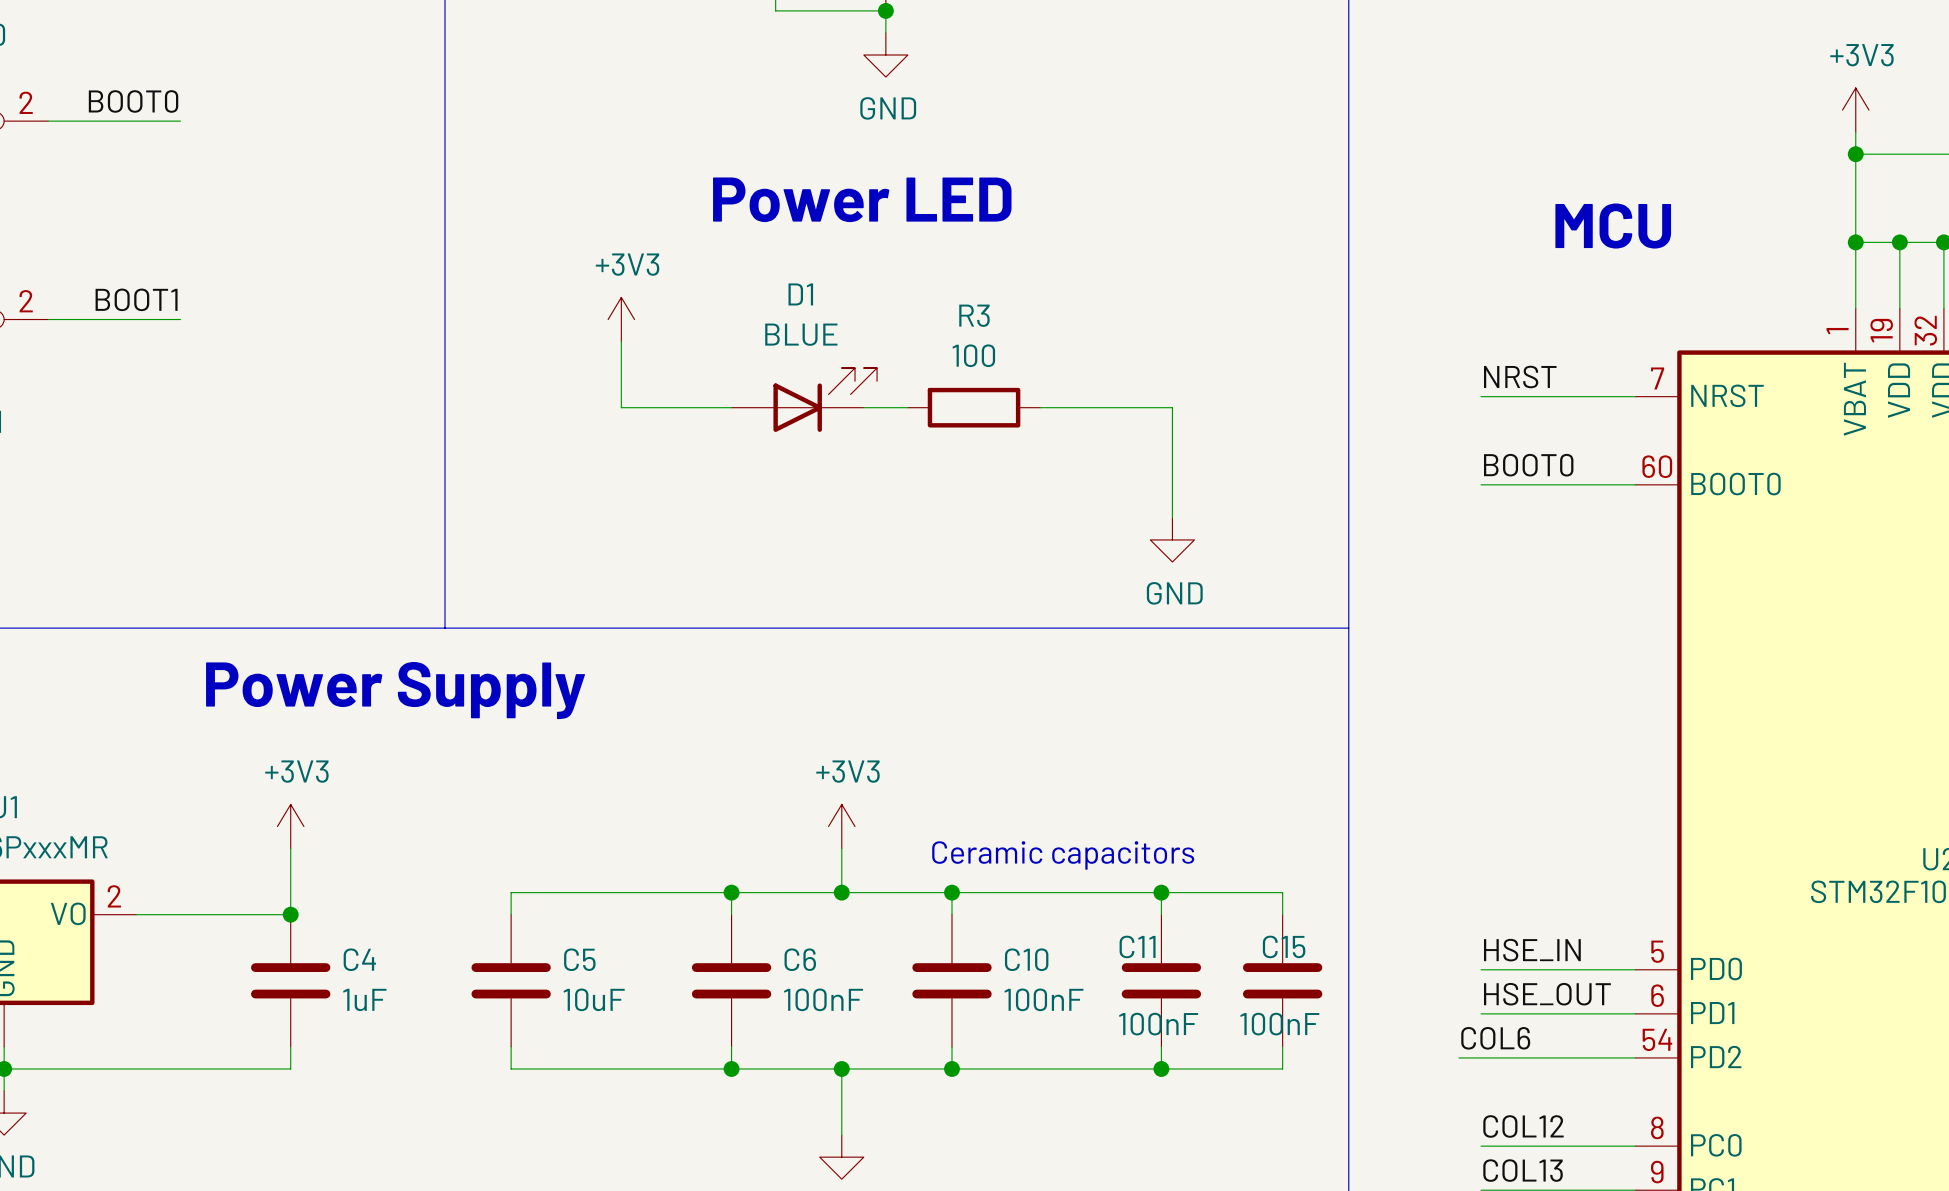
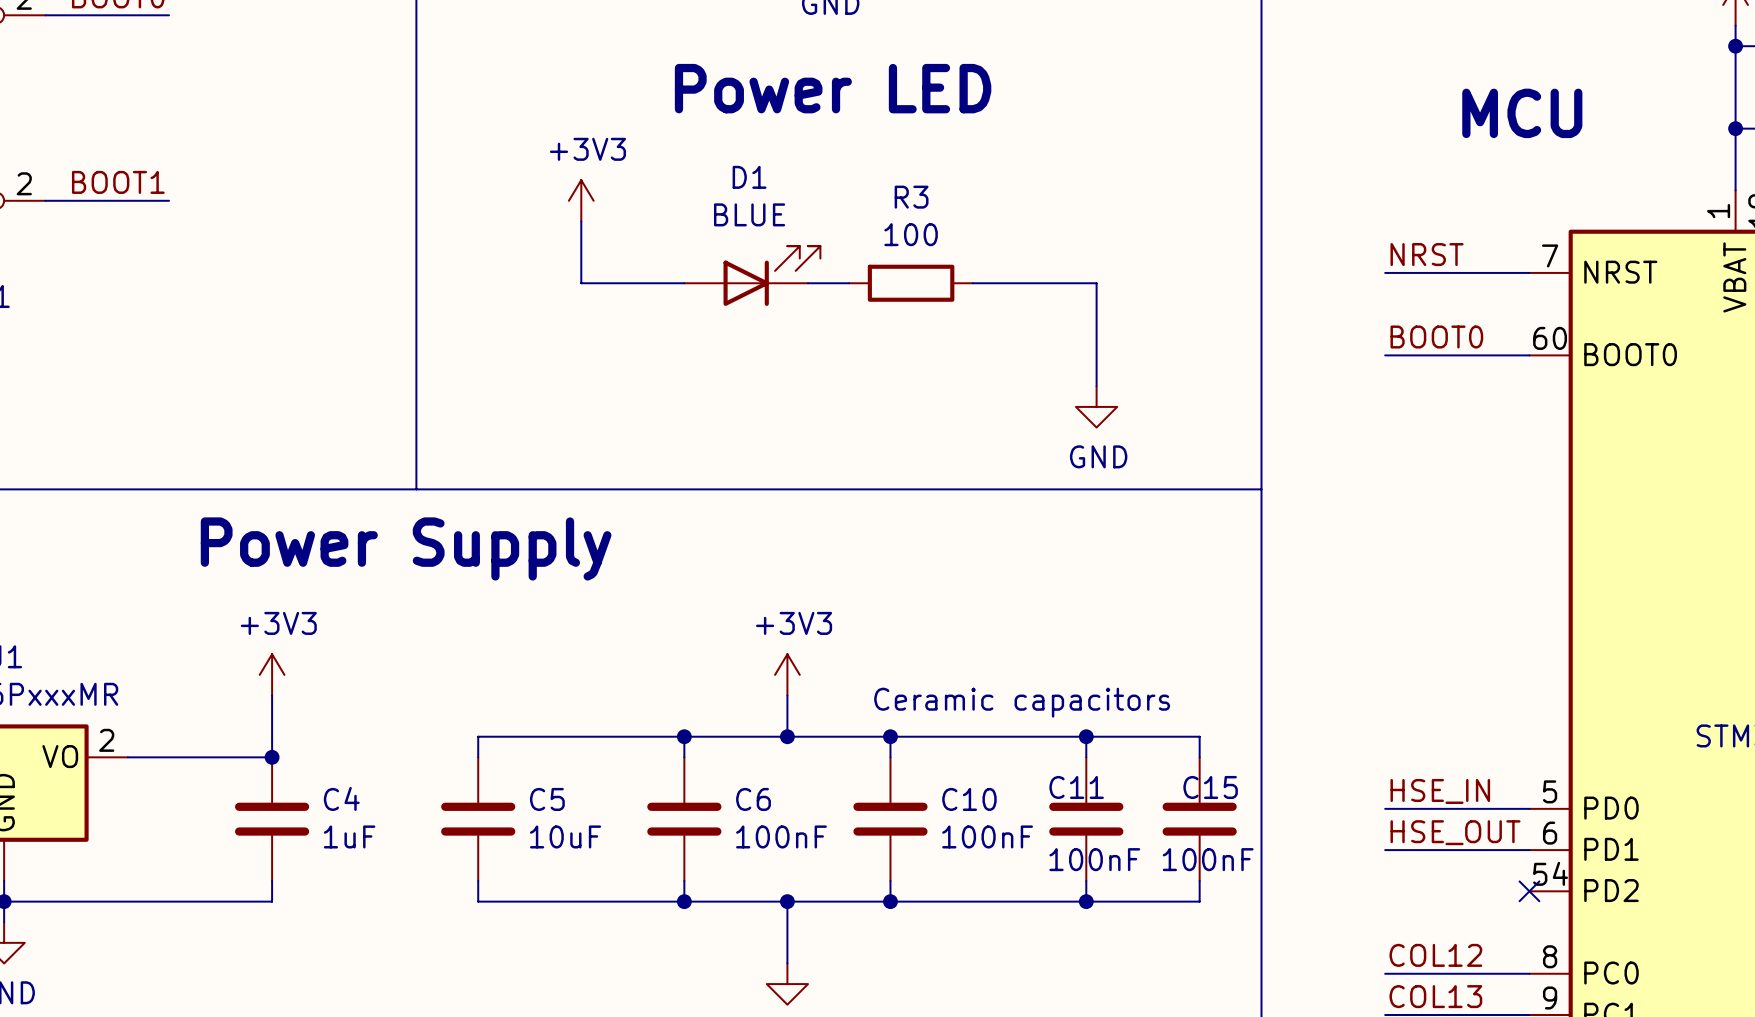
label: COL6 (1495, 1038) -> none
wire: (1458, 1057) (1635, 1057) -> none
no-connect mark: none -> (1529, 891)

